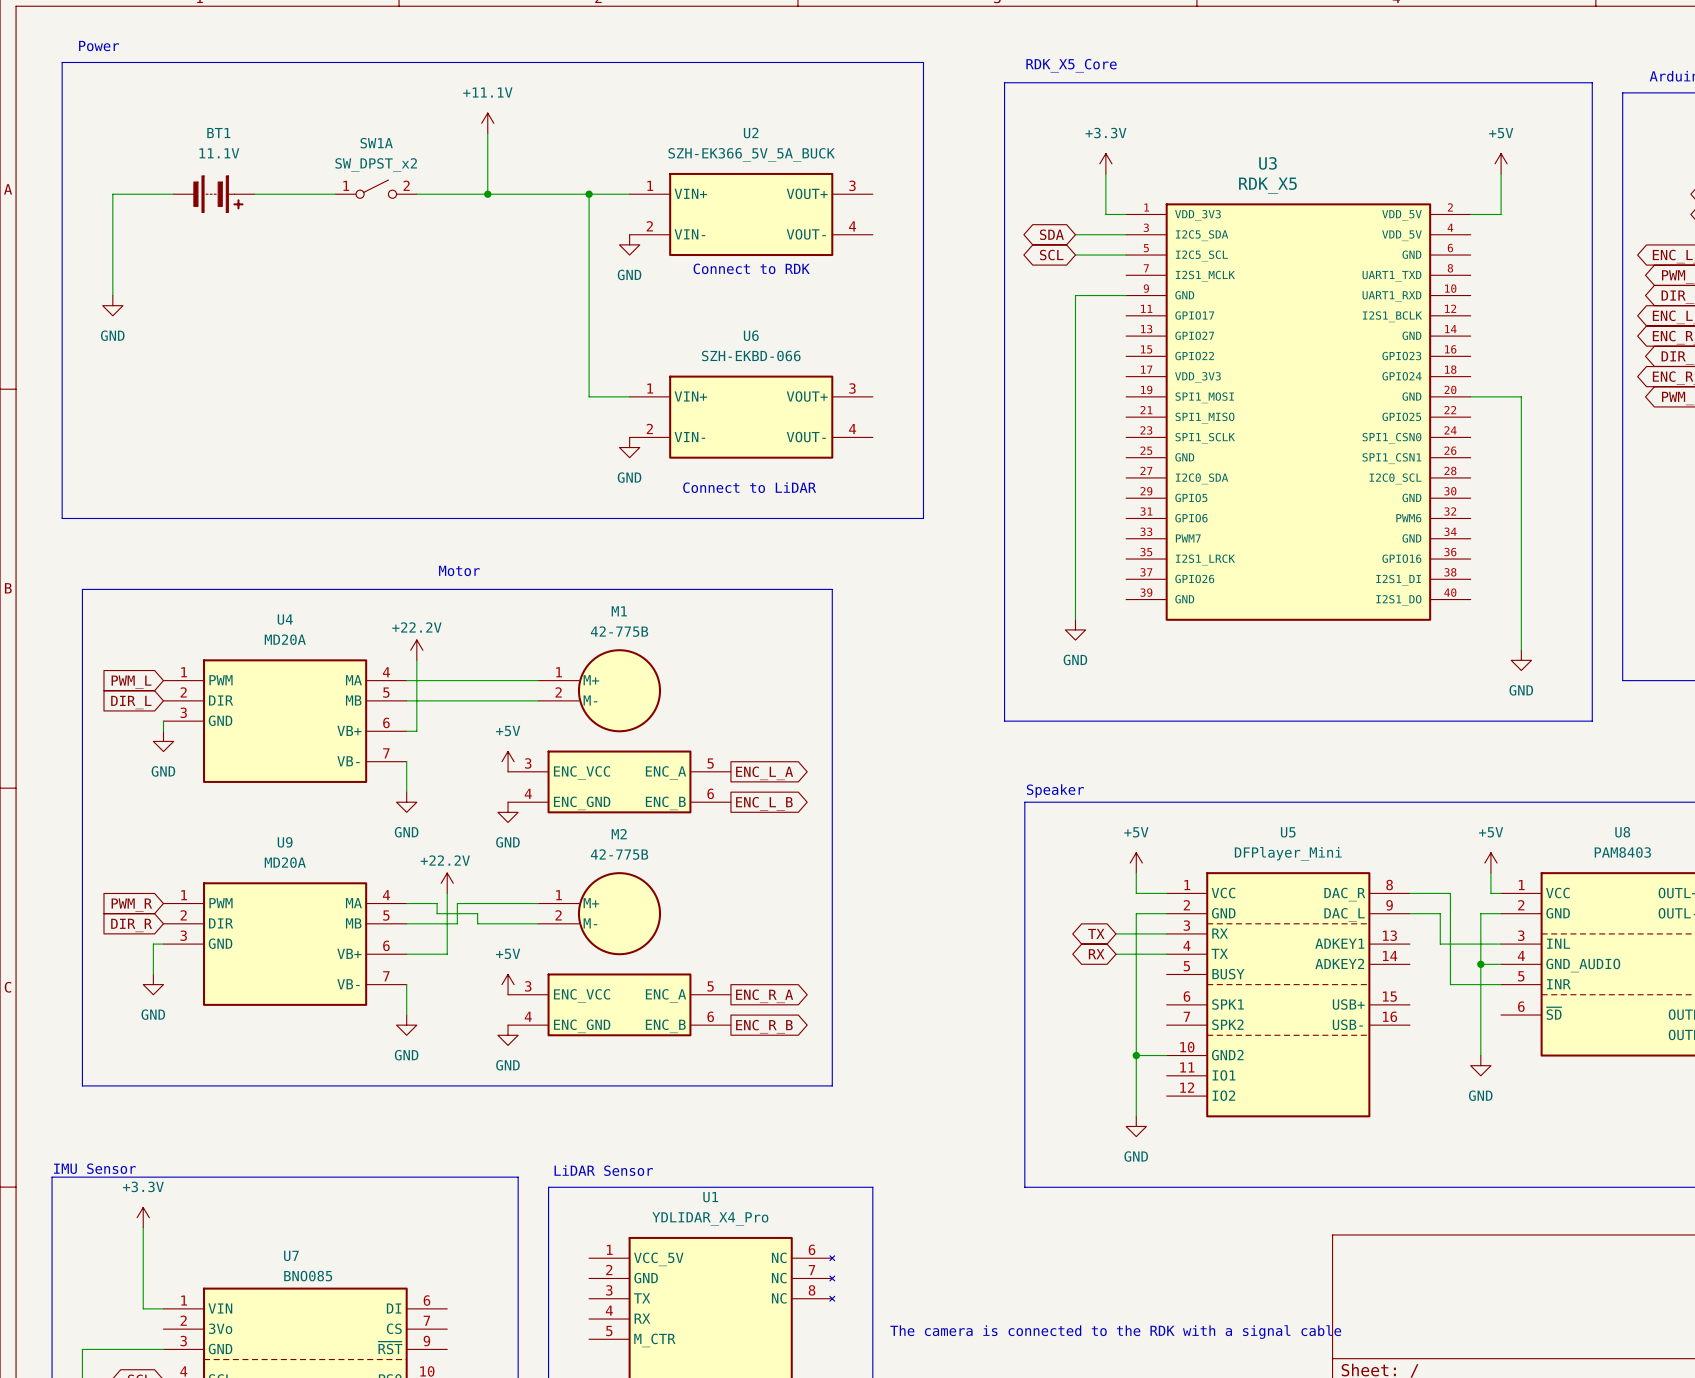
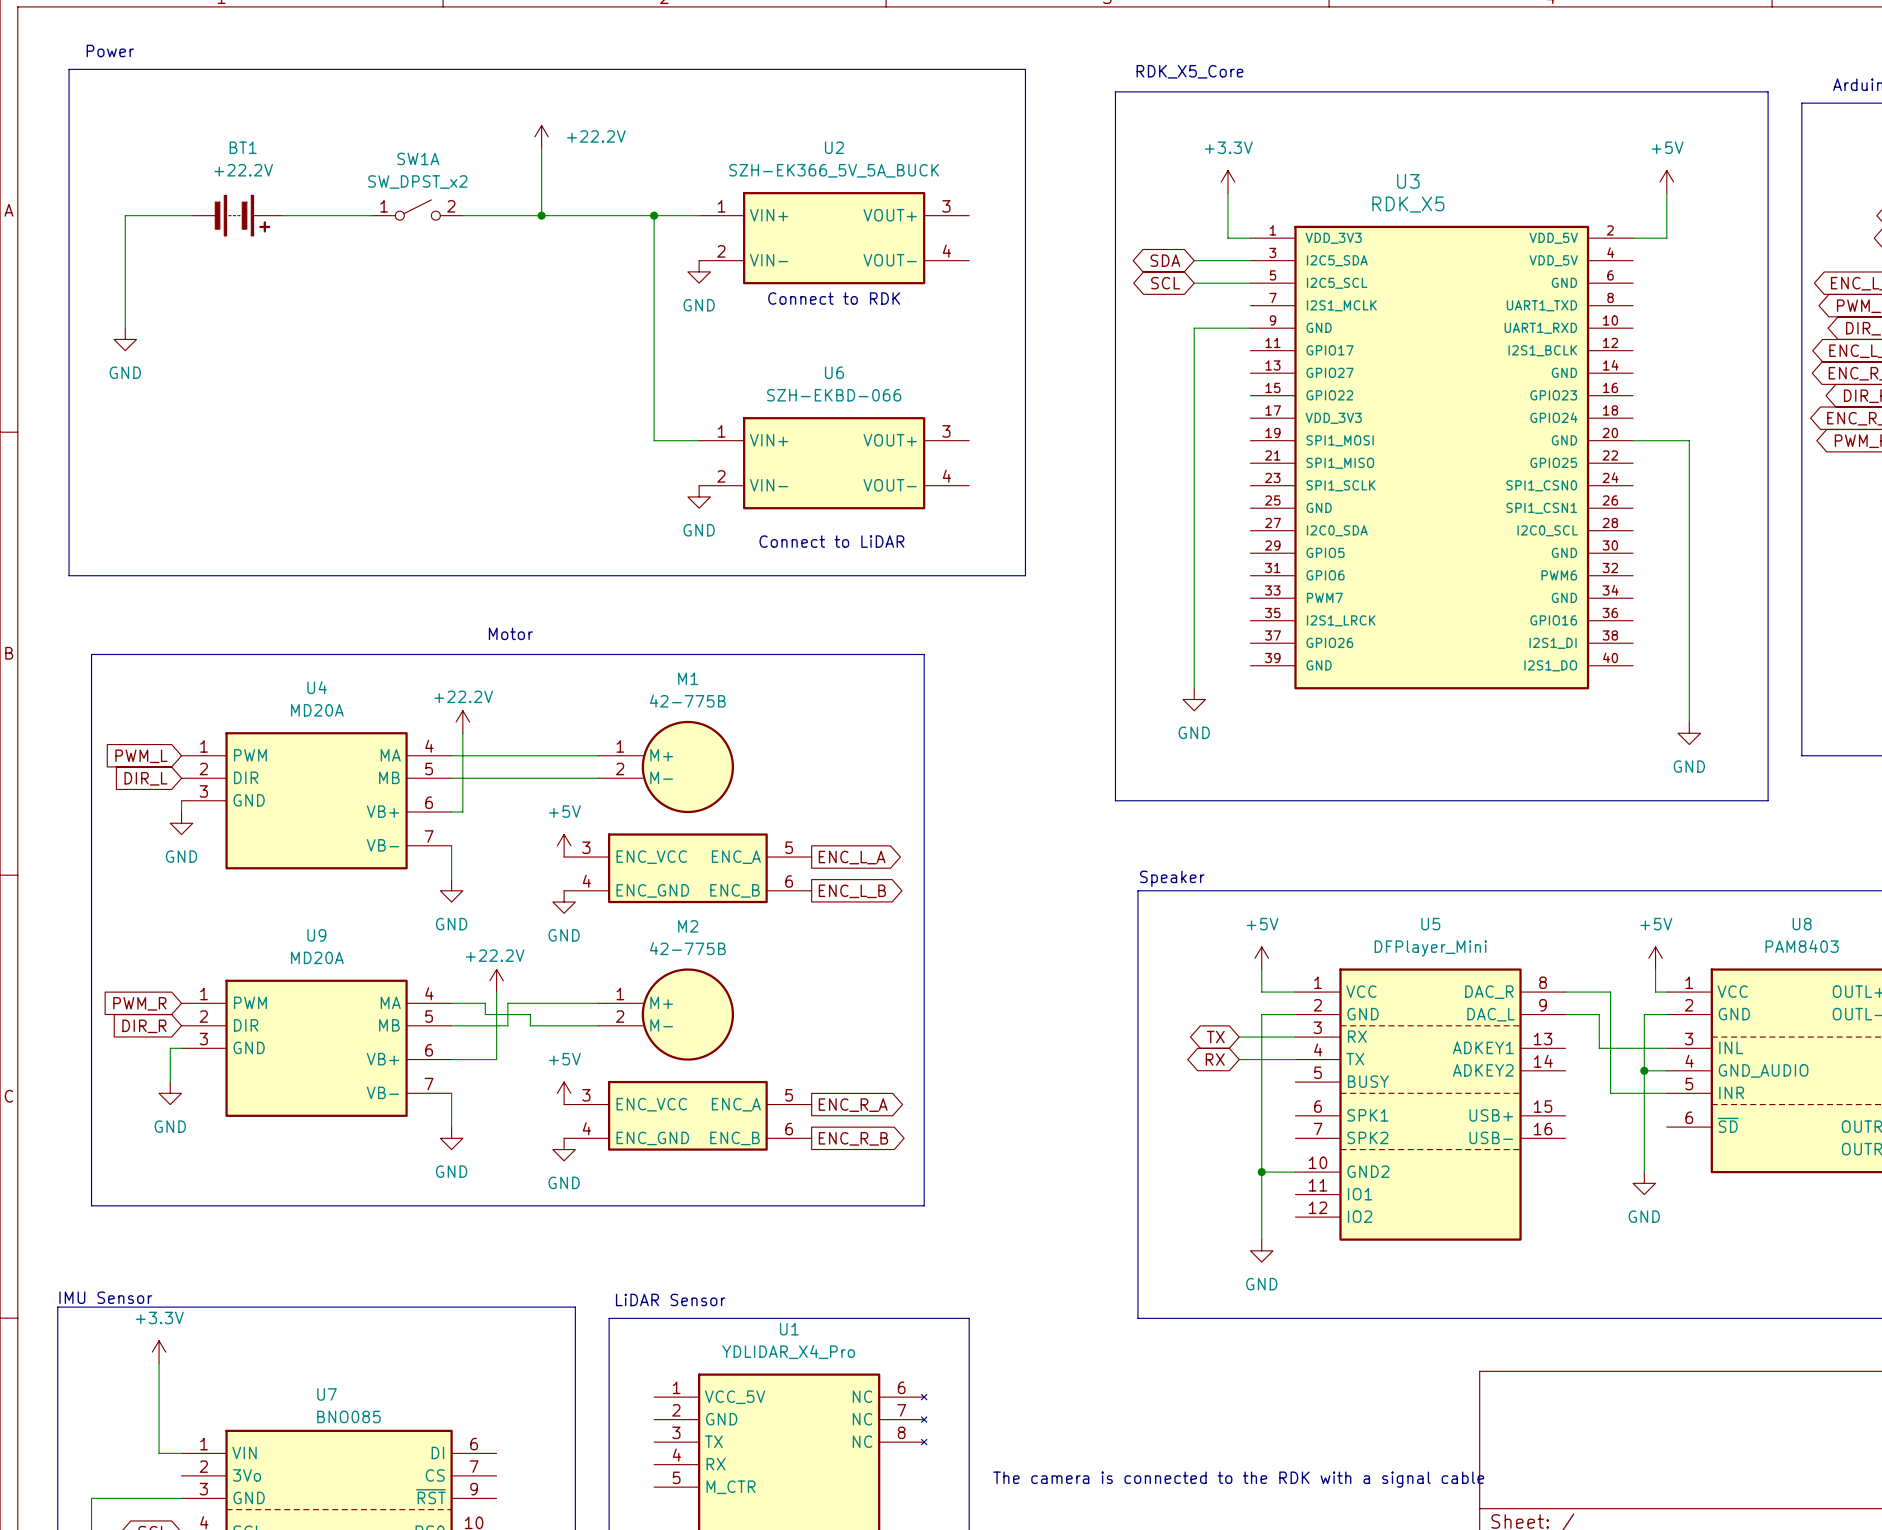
power symbol: +11.1V (487, 123) -> +22.2V (541, 136)
BT1 value: 11.1V (219, 153) -> +22.2V (243, 170)

